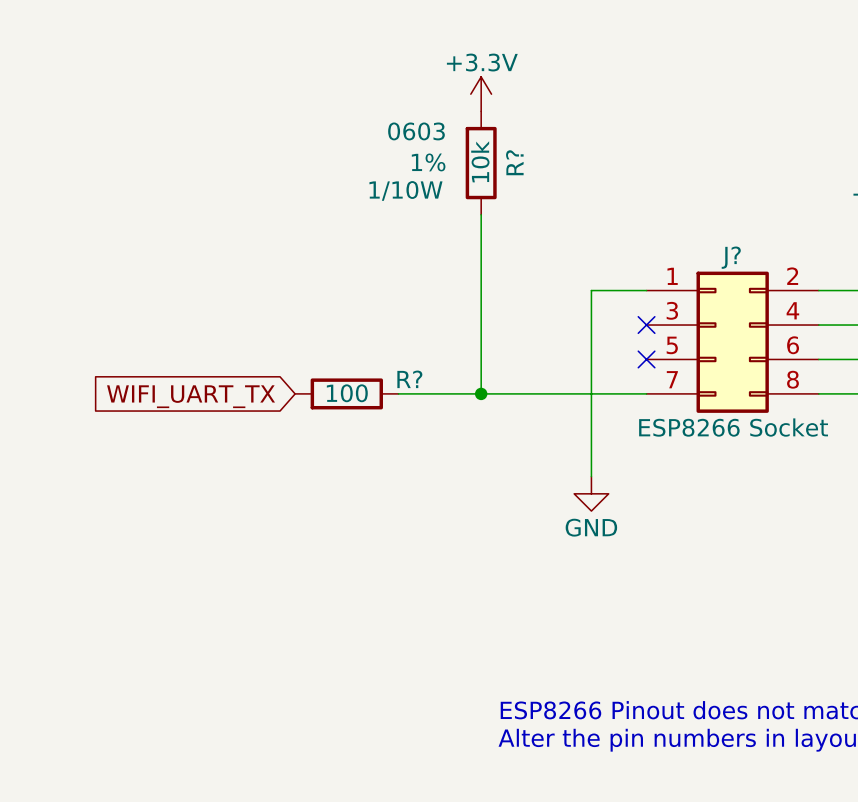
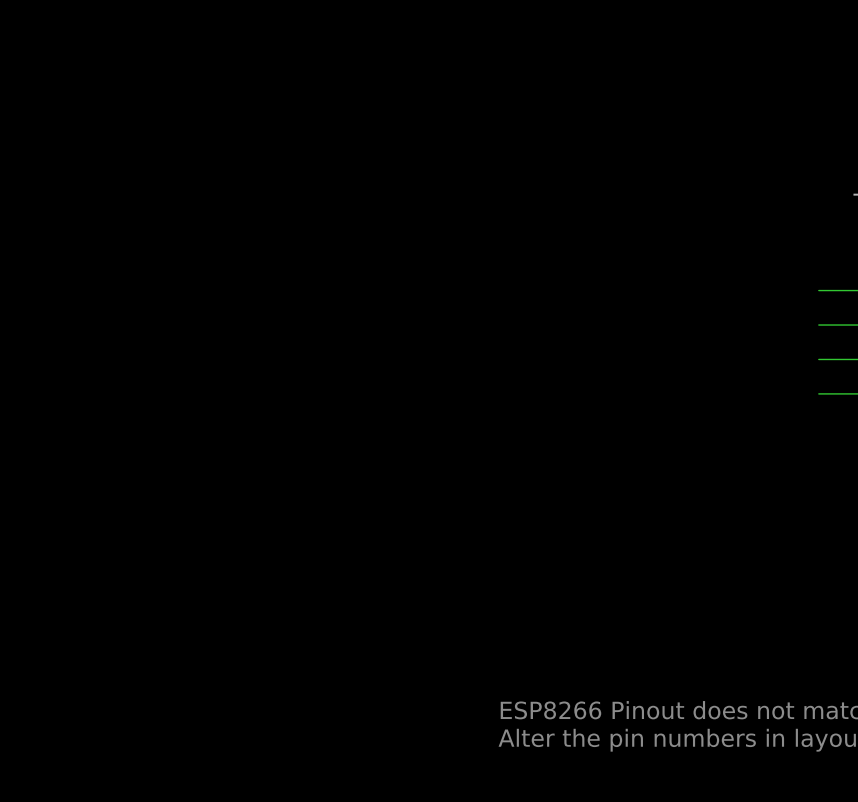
power symbol: +3.3V (481, 94) -> none
R?: 10k (481, 163) -> none
wire: (481, 214) (481, 393) -> none
wire: (646, 290) (591, 290) (591, 476) -> none
no-connect mark: (646, 325) -> none
J?: ESP8266 Socket (732, 342) -> none
no-connect mark: (646, 359) -> none
R?: 100 (346, 393) -> none
wire: (398, 393) (646, 393) -> none
junction: (481, 393) -> none
global label: WIFI_UART_TX (191, 396) -> none
power symbol: GND (591, 493) -> none

